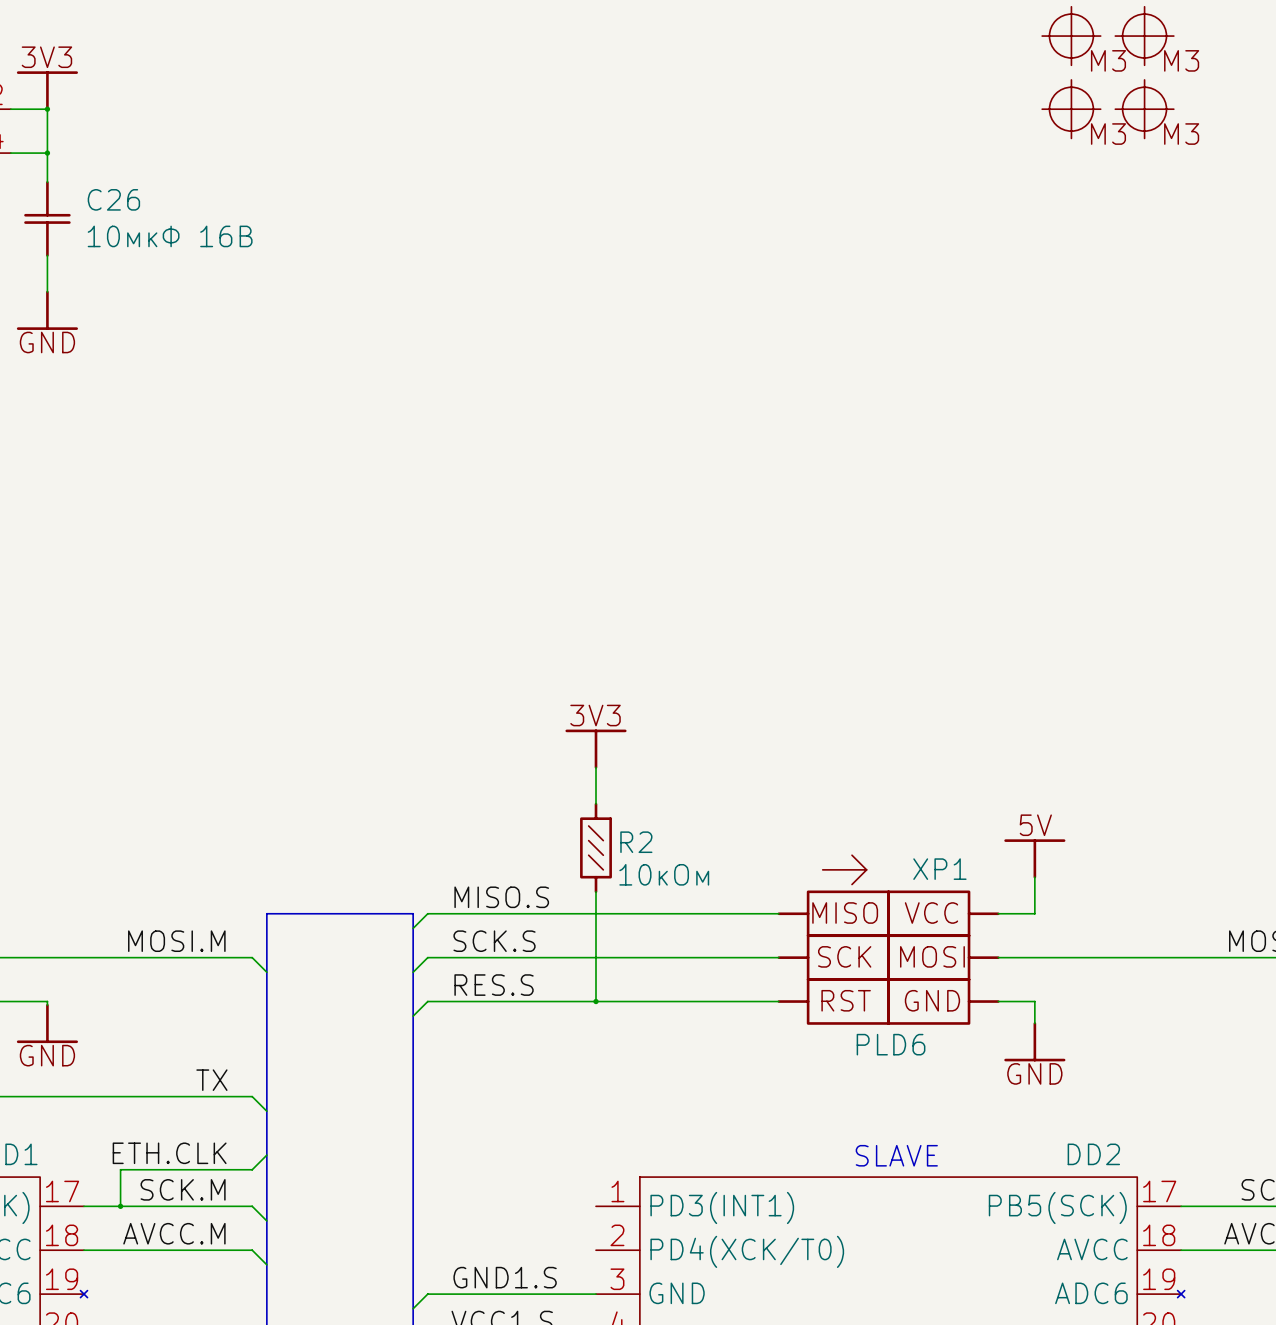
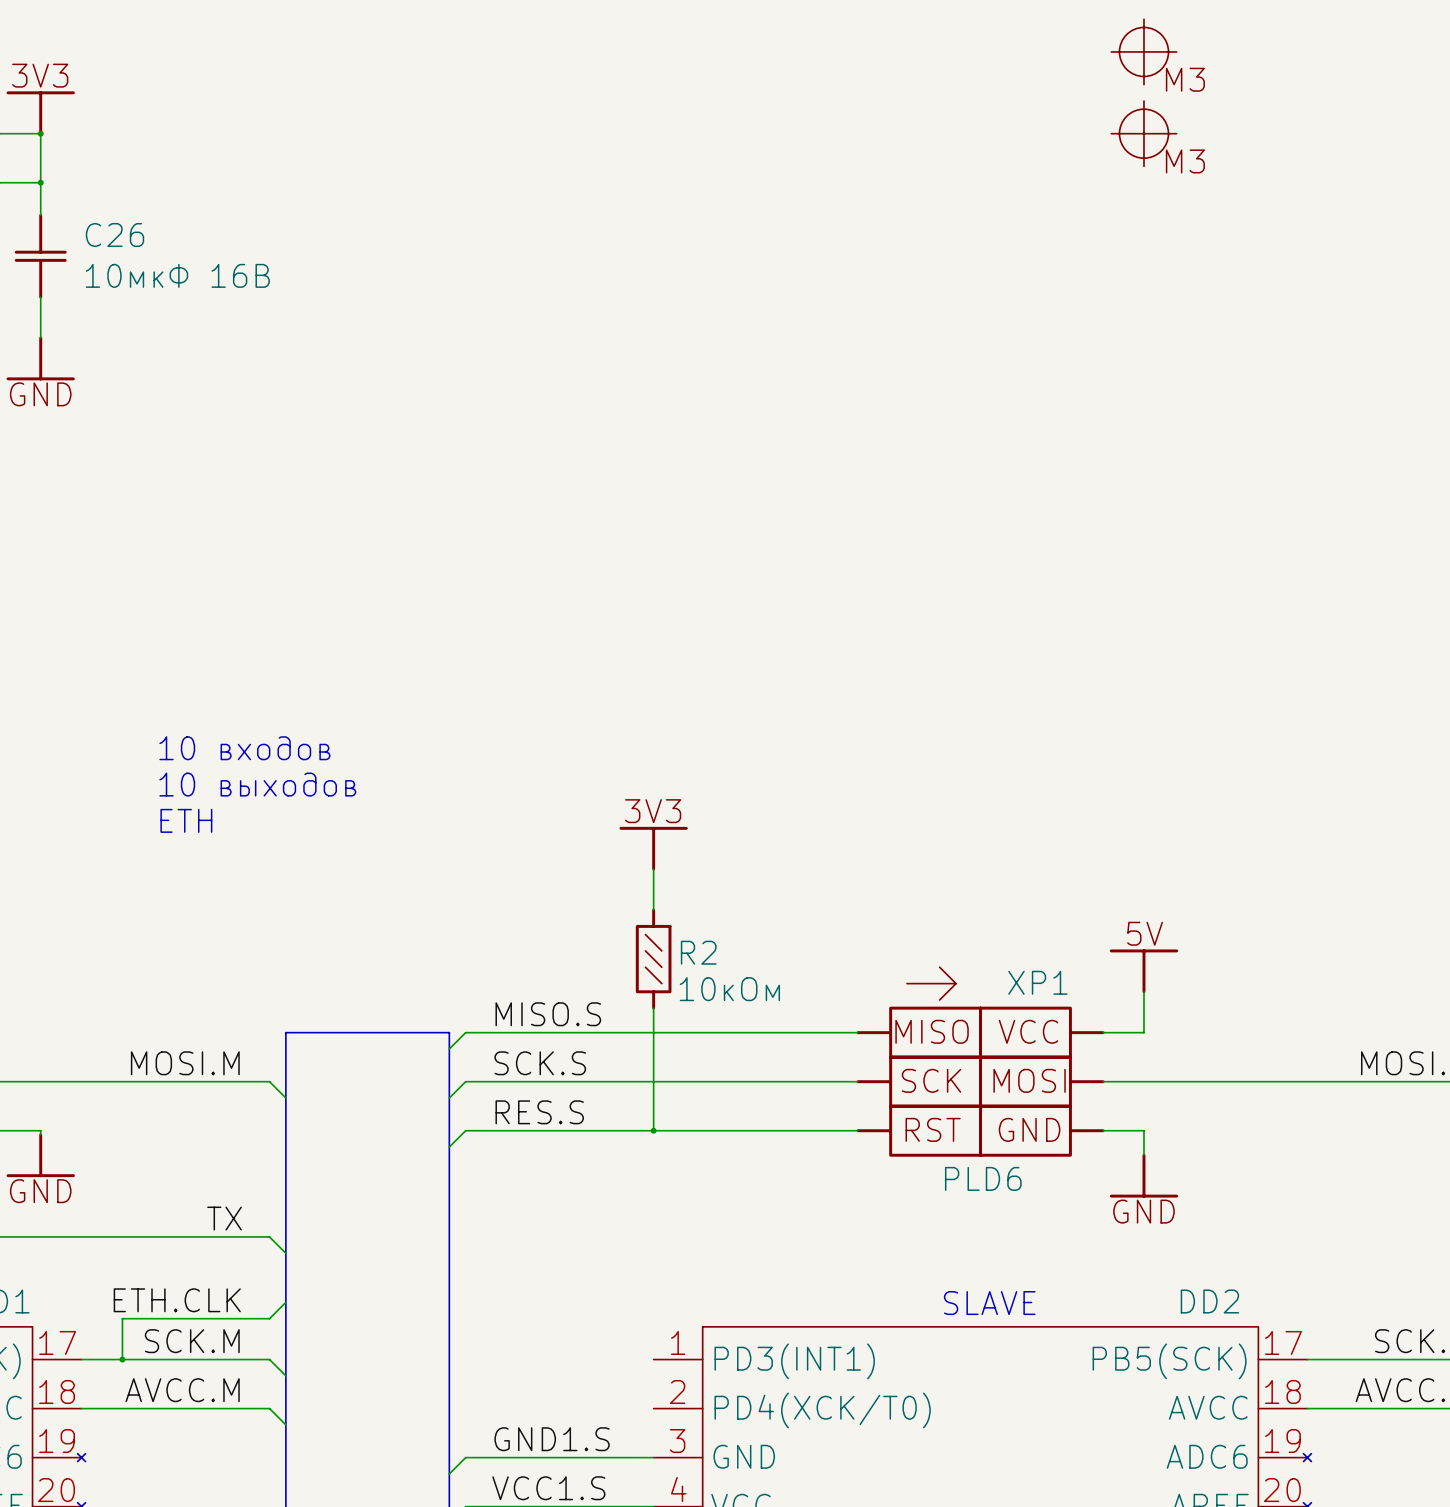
part position: (1071, 36) -> (1143, 51)
part: (1144, 36) -> none
part position: (1071, 109) -> (1143, 133)
part: (1144, 109) -> none
text: none -> 10 входов (244, 748)
text: none -> 10 выходов (257, 784)
text: none -> ETH (186, 820)

